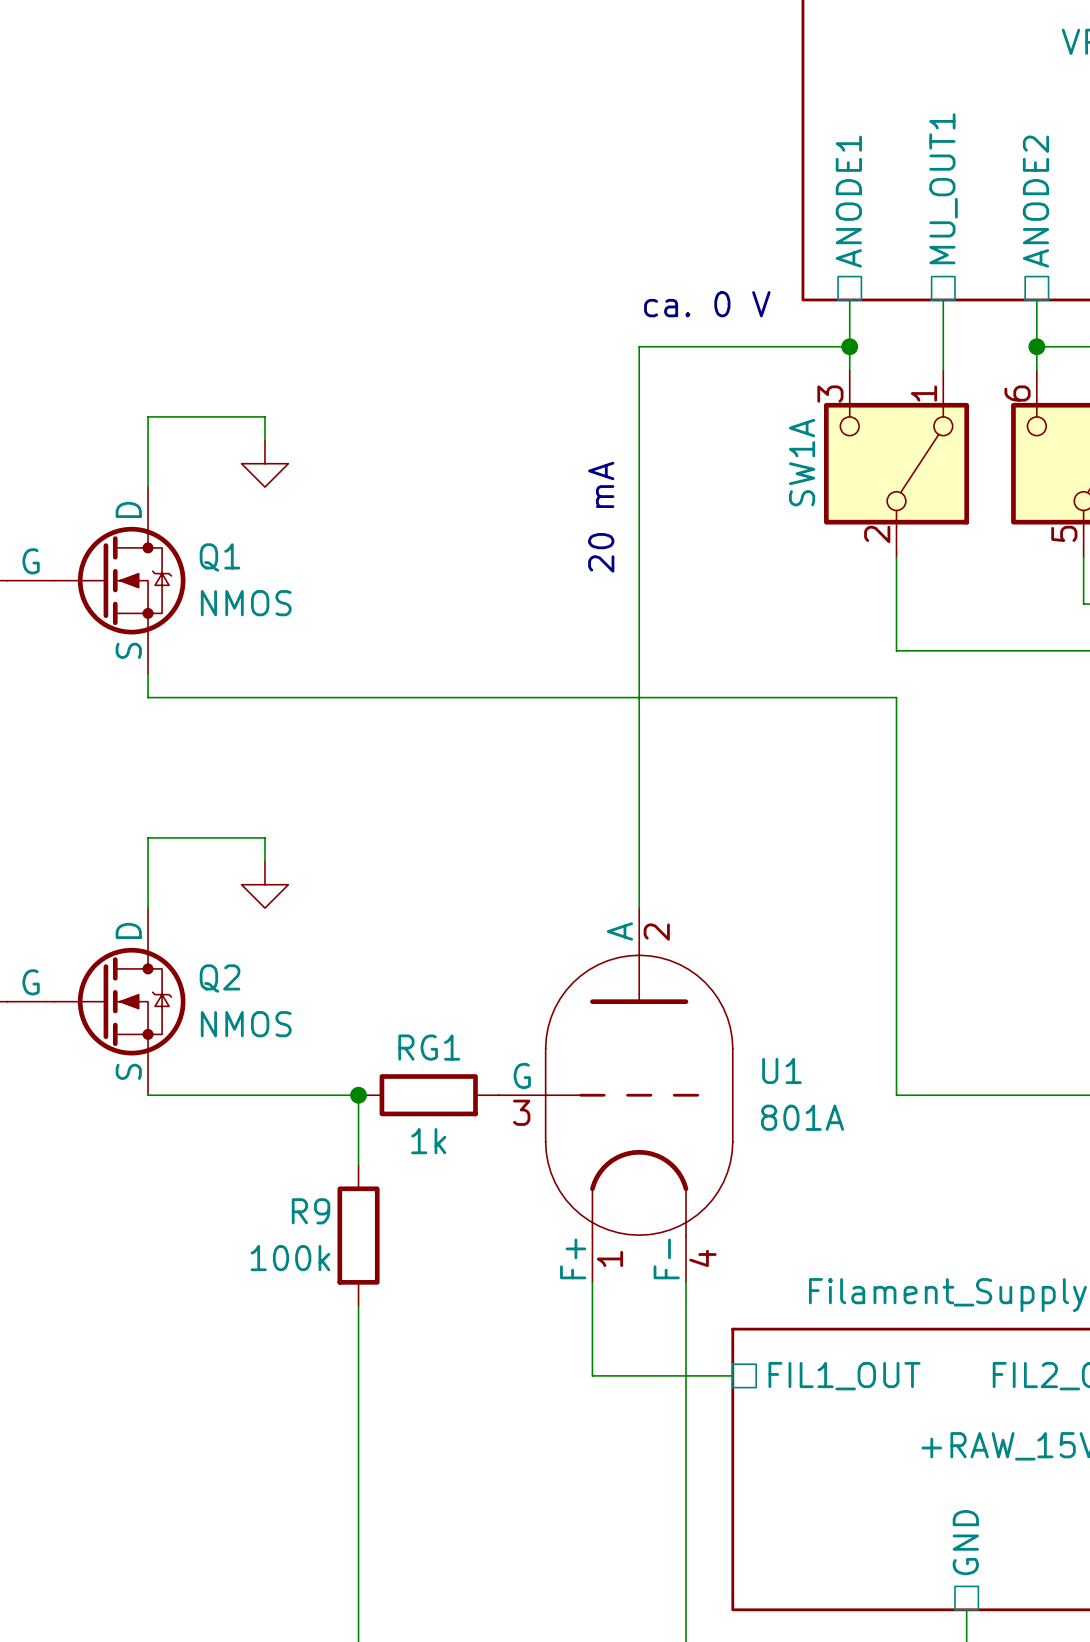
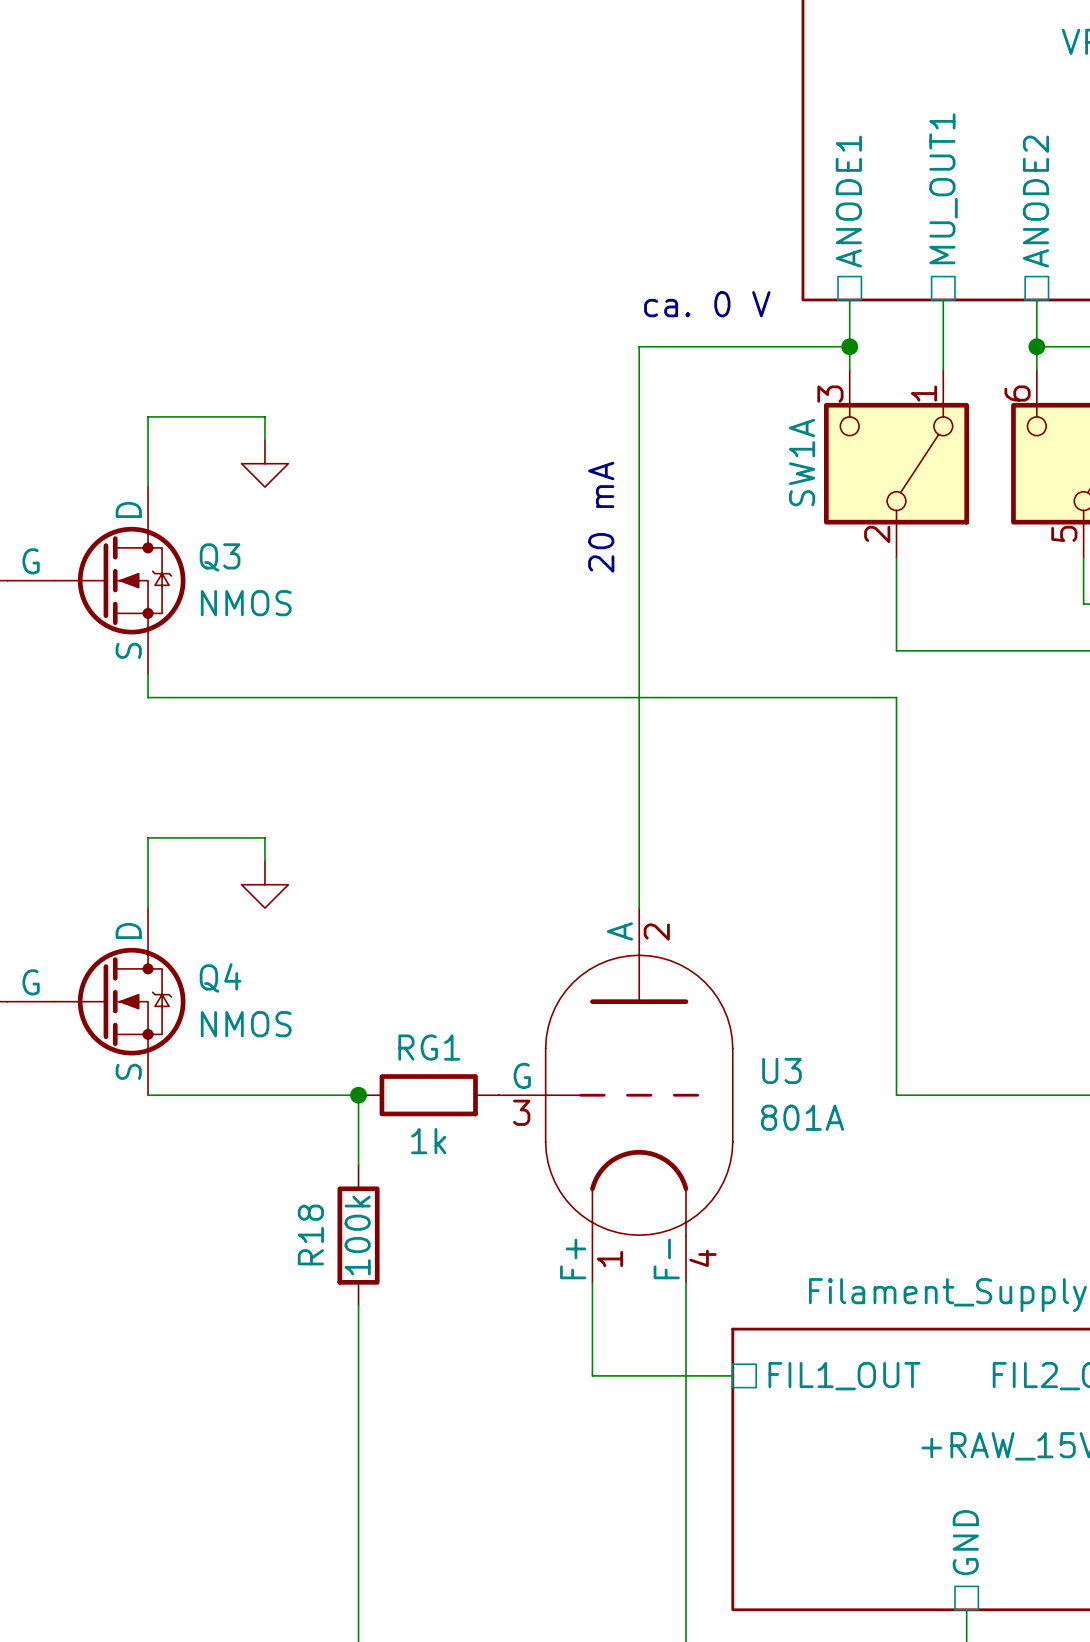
Q1 name: Q1 (220, 557) -> Q3 (220, 557)
Q2 name: Q2 (220, 978) -> Q4 (220, 977)
U1 name: U1 (781, 1070) -> U3 (781, 1070)
R9 name: R9 (311, 1211) -> R18 (310, 1235)
R9 value rotation: 0° (290, 1258) -> 90° counterclockwise (357, 1235)

